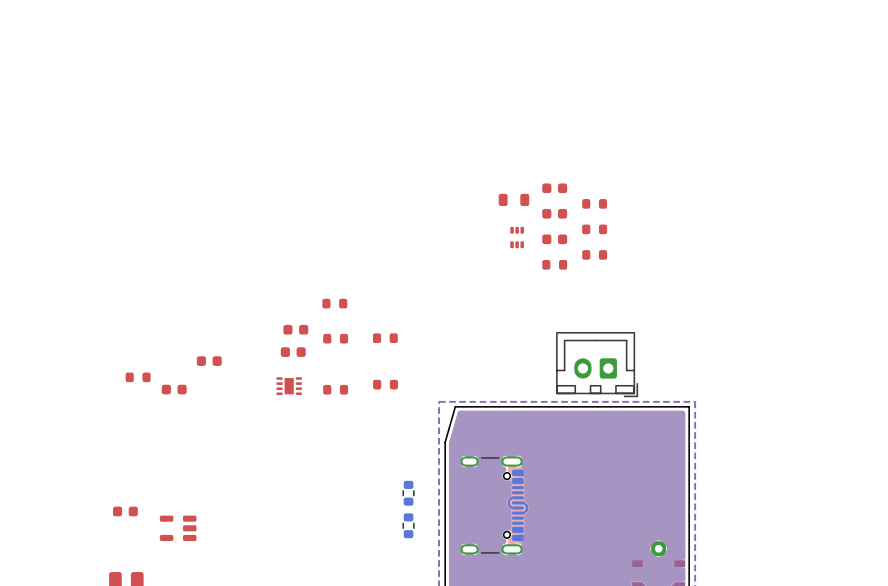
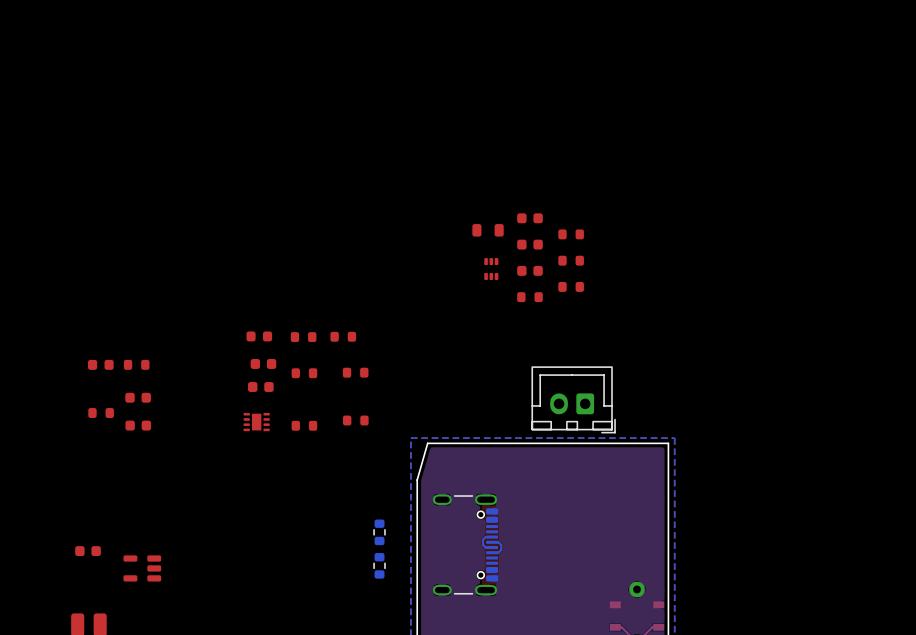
part: none -> (259, 336)
part: none -> (343, 336)
part: none -> (100, 364)
part: none -> (136, 364)
part position: (209, 361) -> (138, 397)

